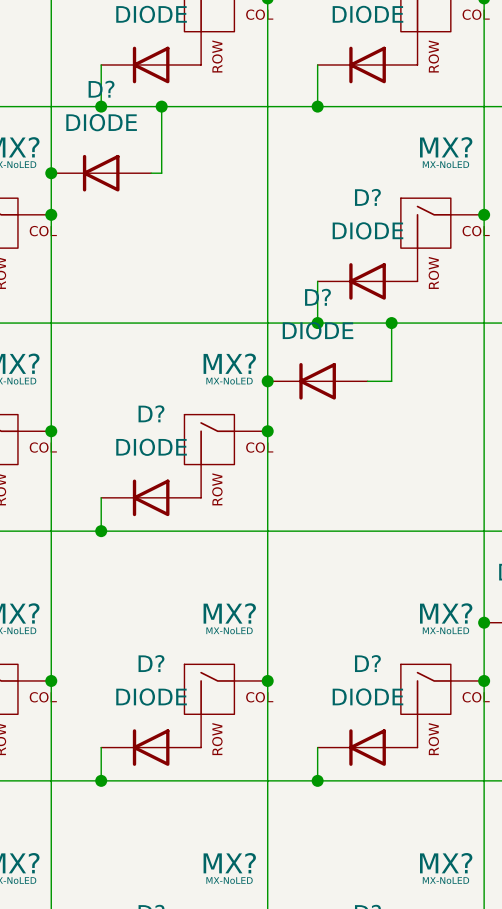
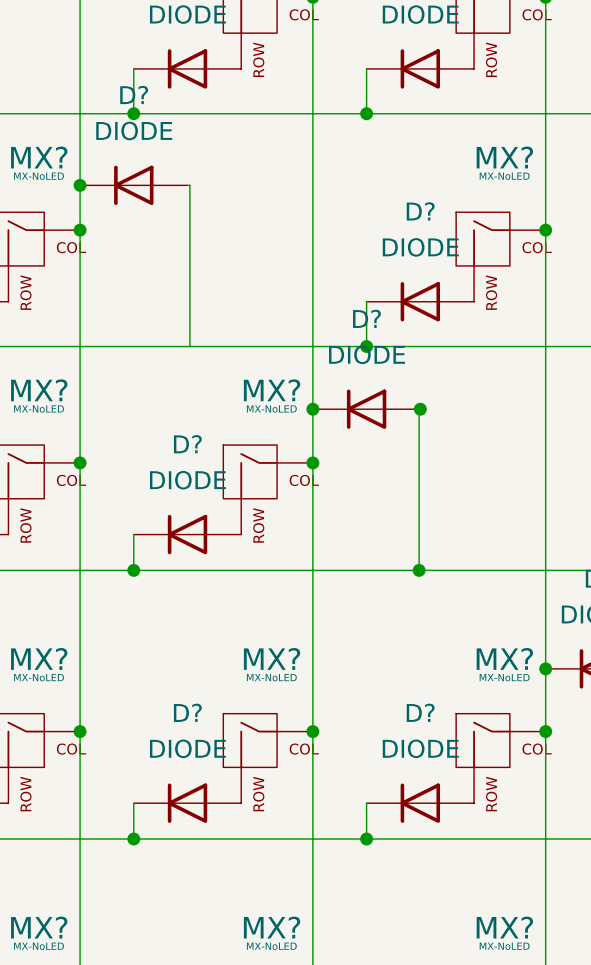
wire: (161, 106) (161, 173) (153, 173) -> (189, 346) (189, 185)
junction: (161, 106) -> none
wire: (391, 323) (391, 381) (367, 381) -> (419, 570) (420, 409)
junction position: (391, 323) -> (420, 409)
junction: none -> (419, 570)

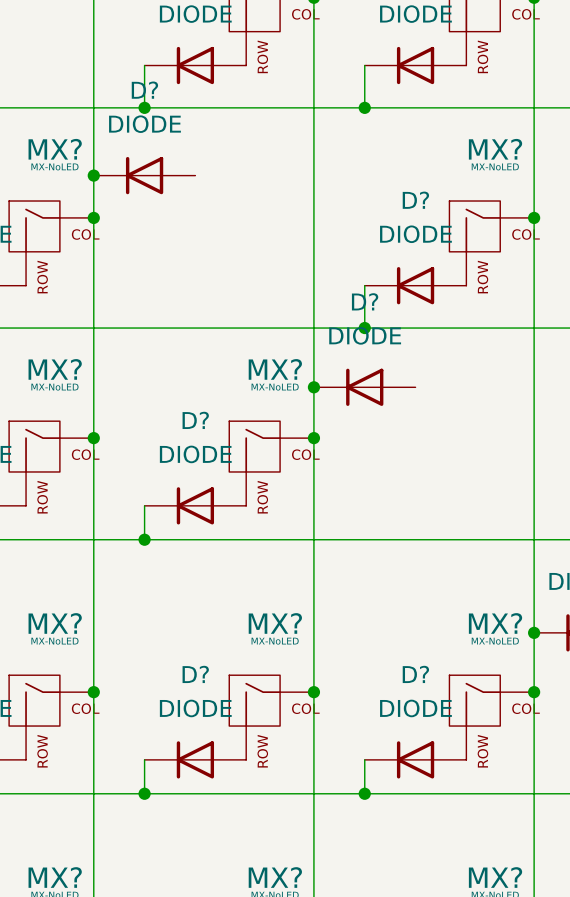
wire: (187, 185) (189, 185) (189, 346) -> none
wire: (420, 409) (419, 570) -> none
junction: (420, 409) -> none
junction: (419, 570) -> none

